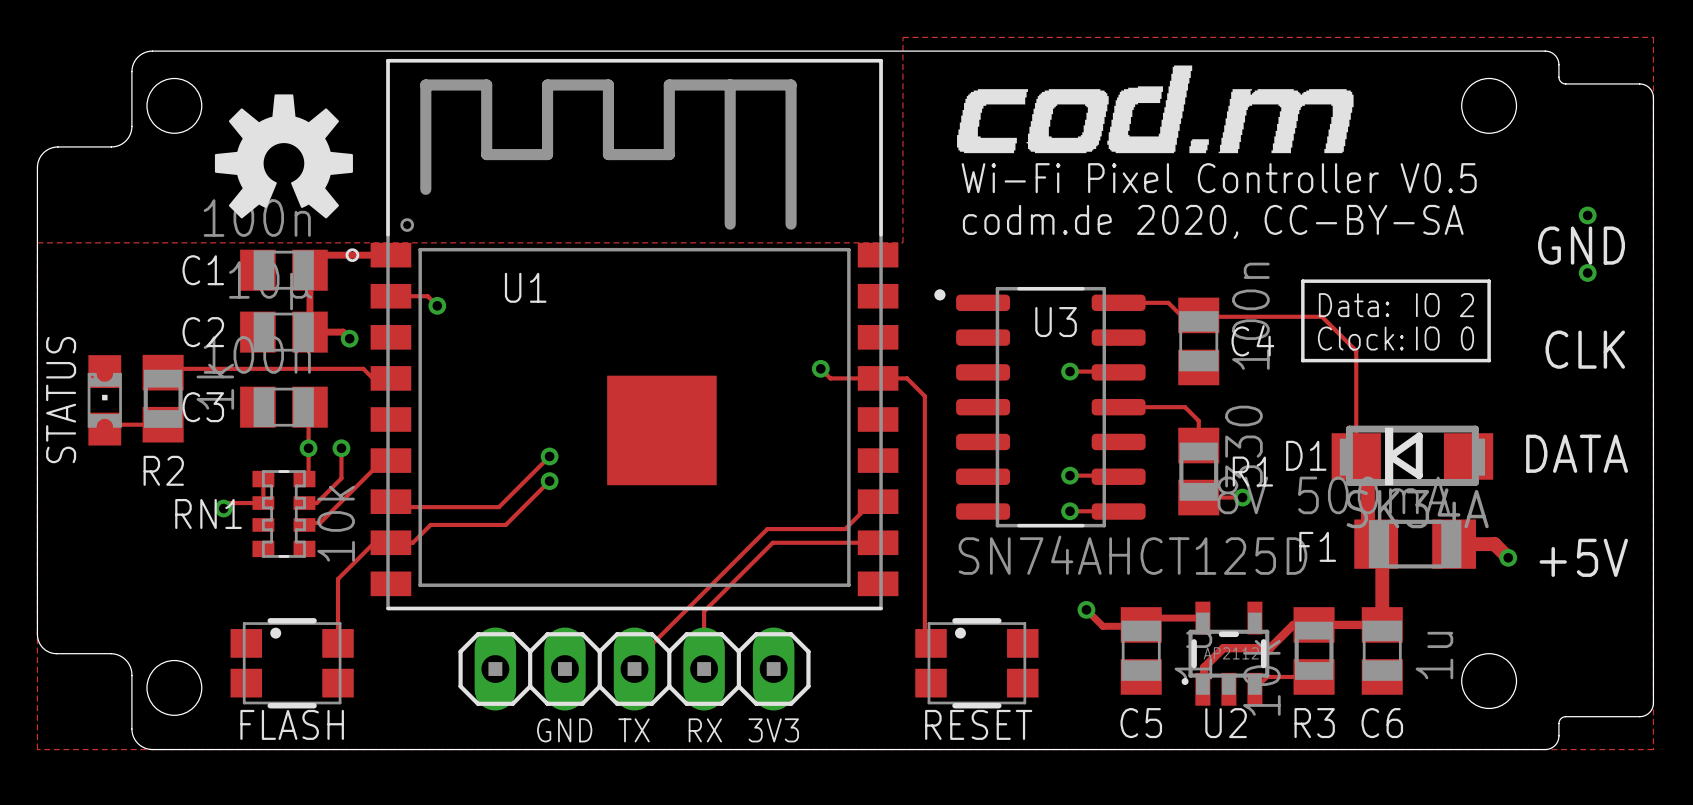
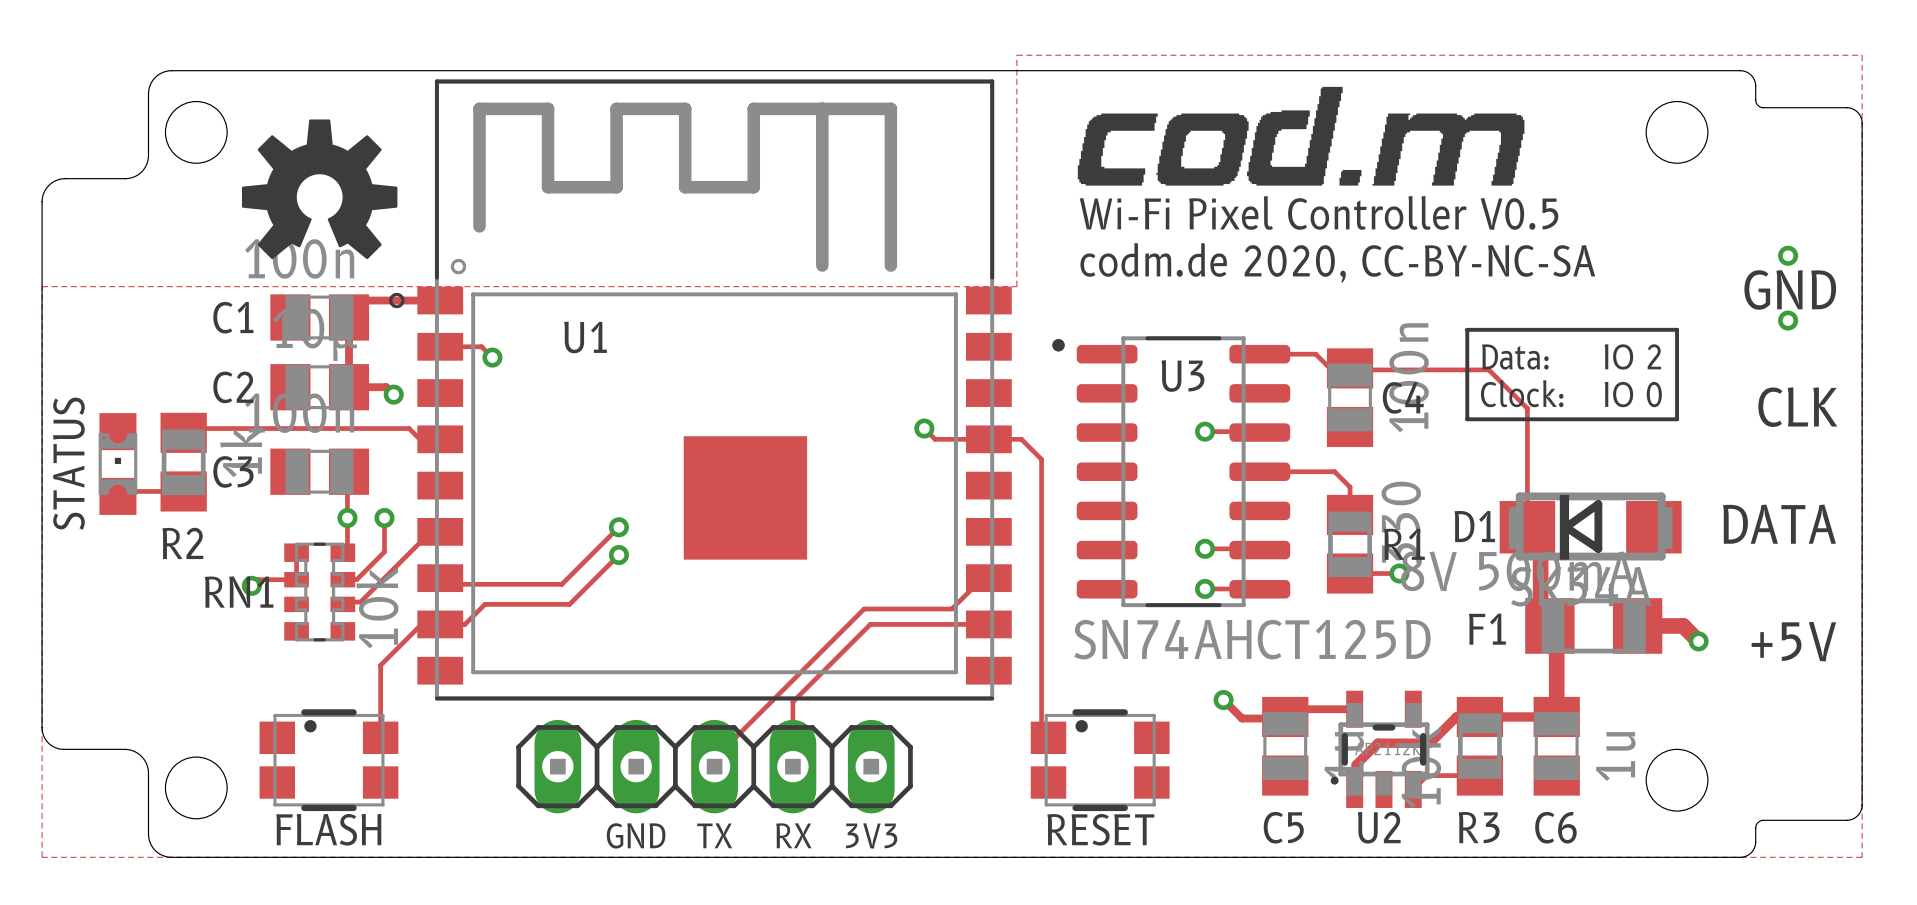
text: codm.de 2020, CC-BY-SA (1213, 221) -> codm.de 2020, CC-BY-NC-SA (1337, 262)

